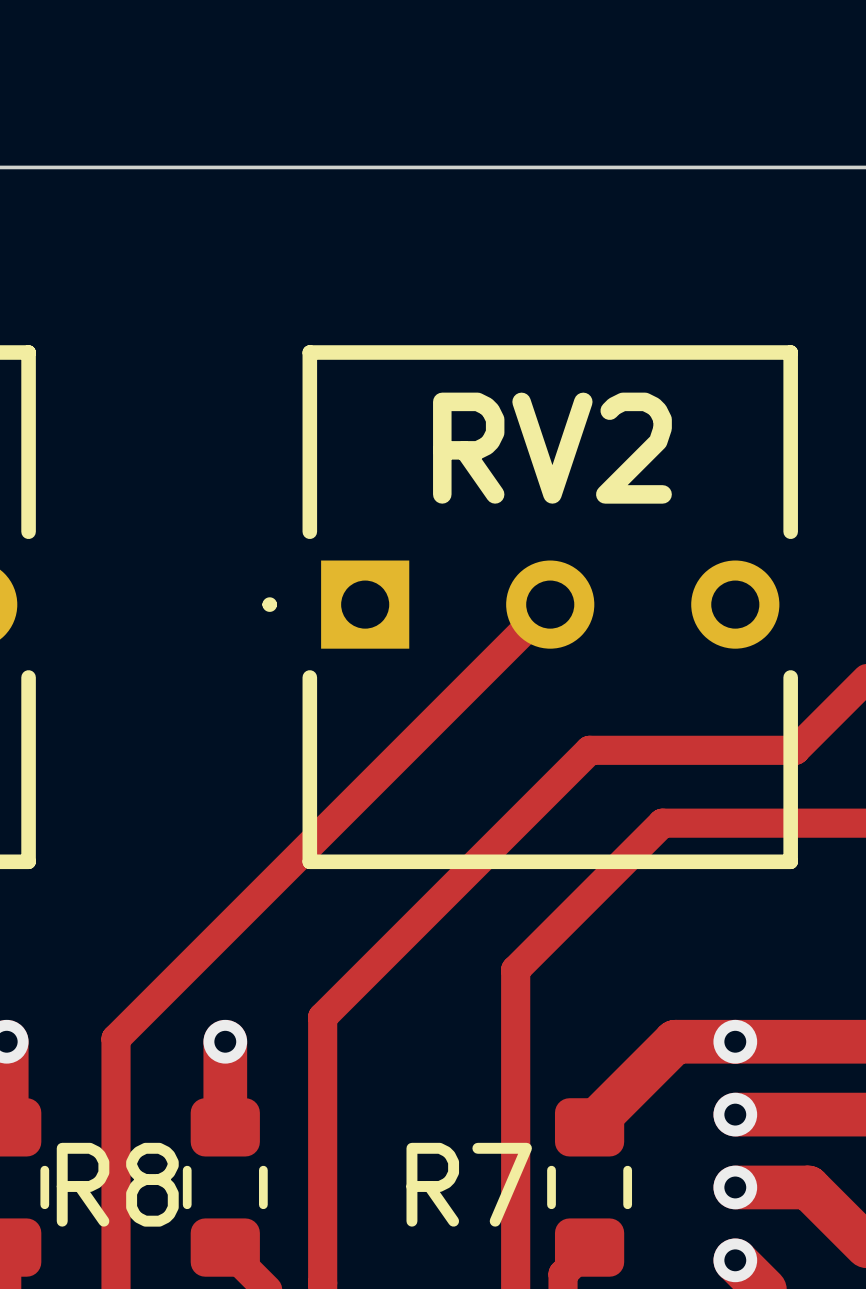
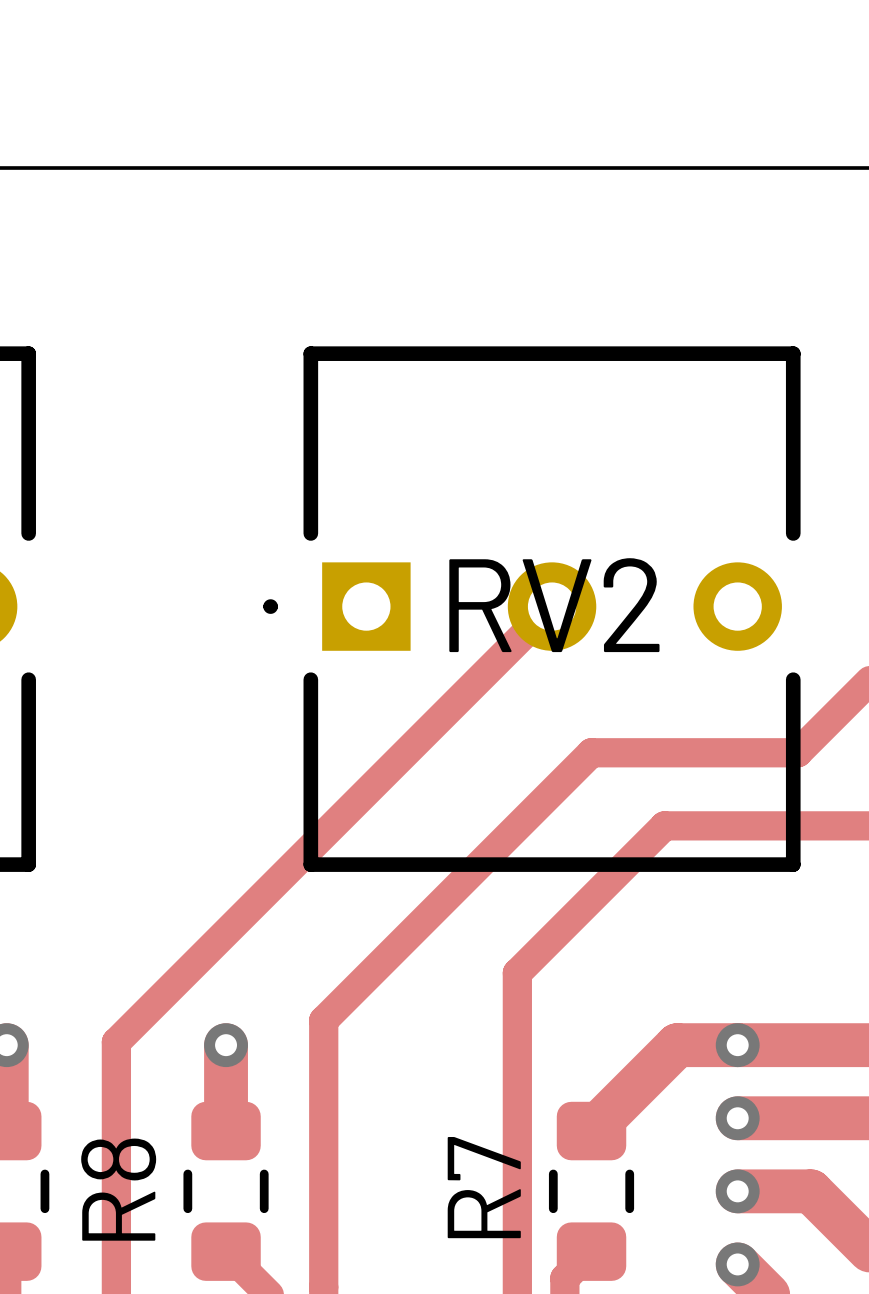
RV2 name position: RV2 (552, 448) -> RV2 (554, 605)
R8 name rotation: 0° (117, 1184) -> 90° counterclockwise (118, 1189)
R7 name rotation: 0° (469, 1184) -> 90° counterclockwise (484, 1187)

